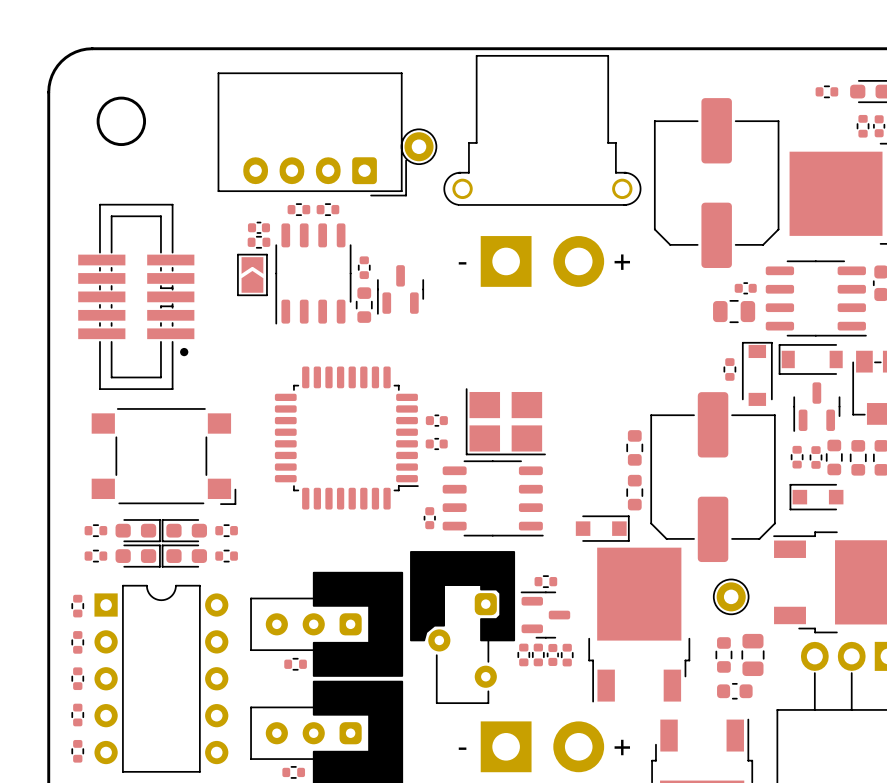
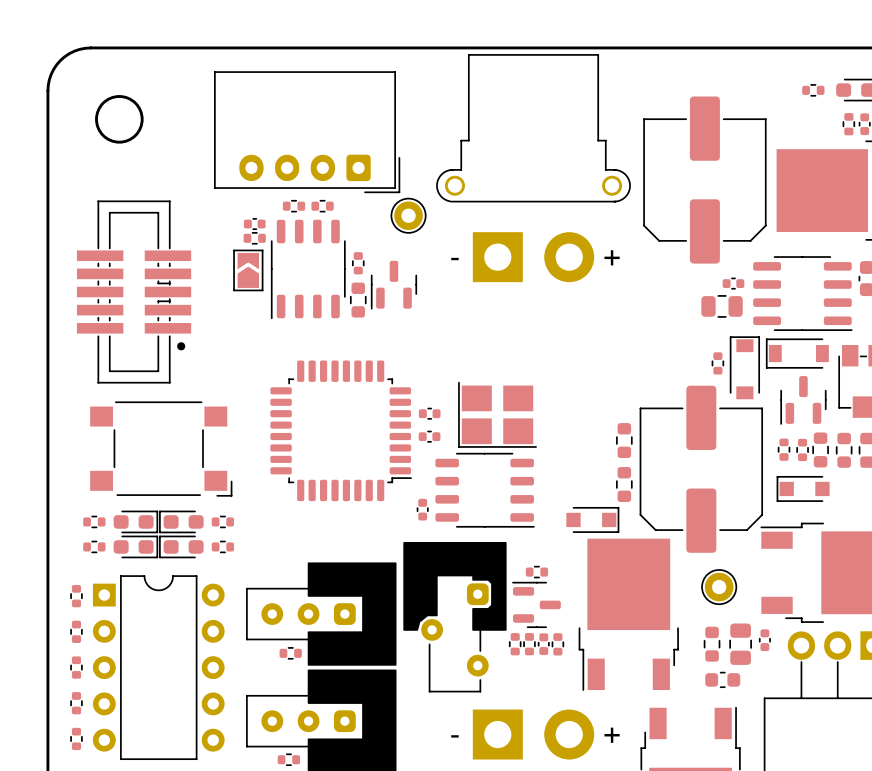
part position: (419, 146) -> (408, 215)
part: none -> (764, 640)

